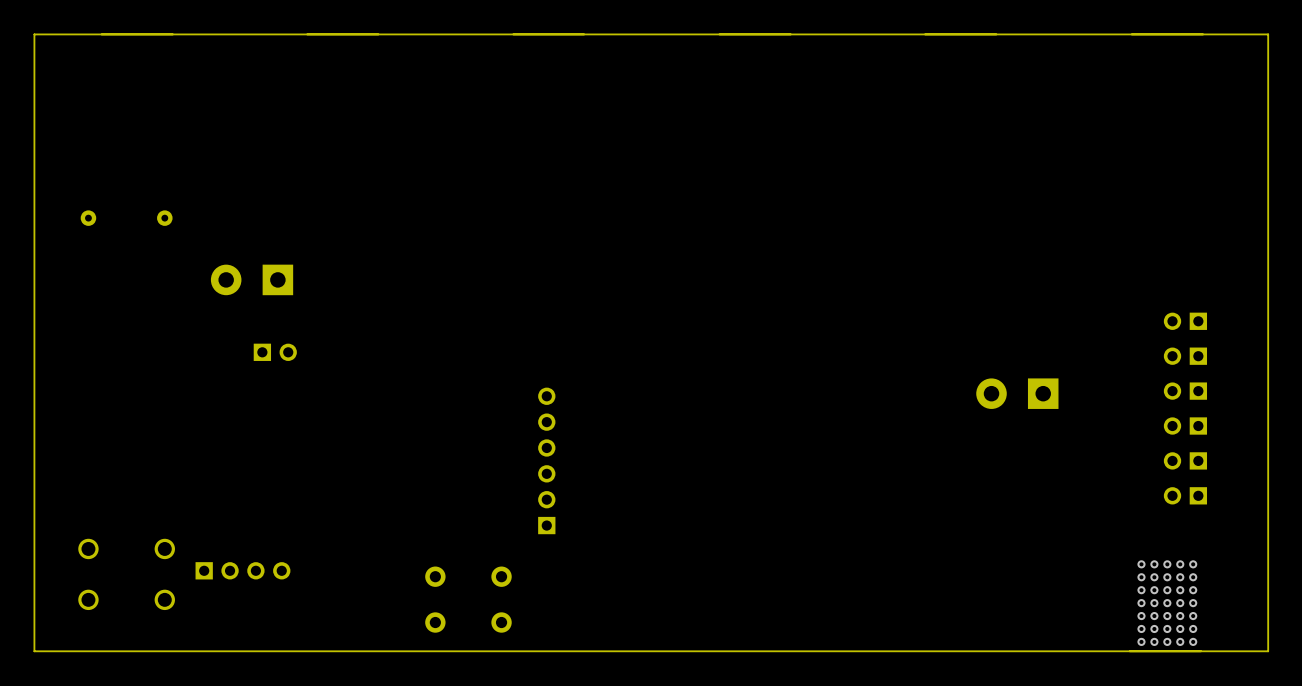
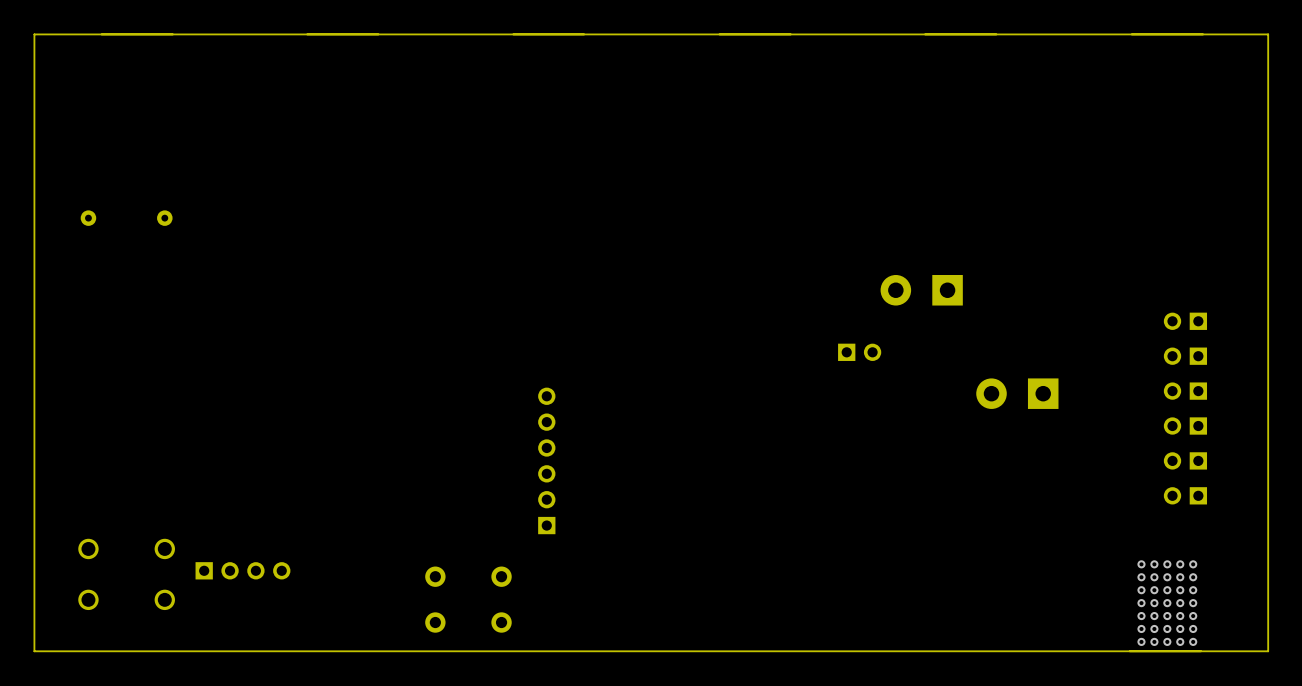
part: (252, 279) -> none
part: none -> (921, 290)
part: (275, 352) -> none
part: none -> (859, 352)

